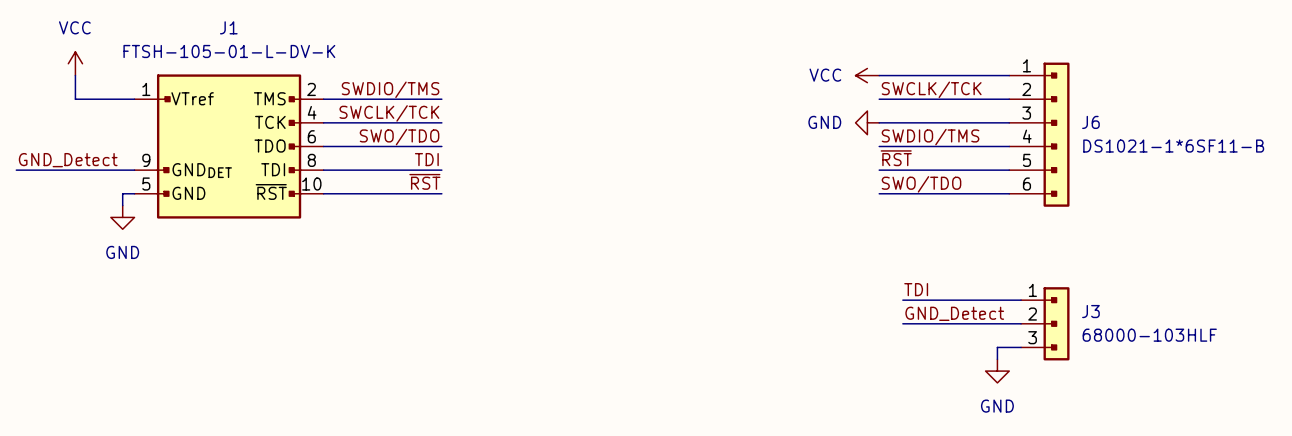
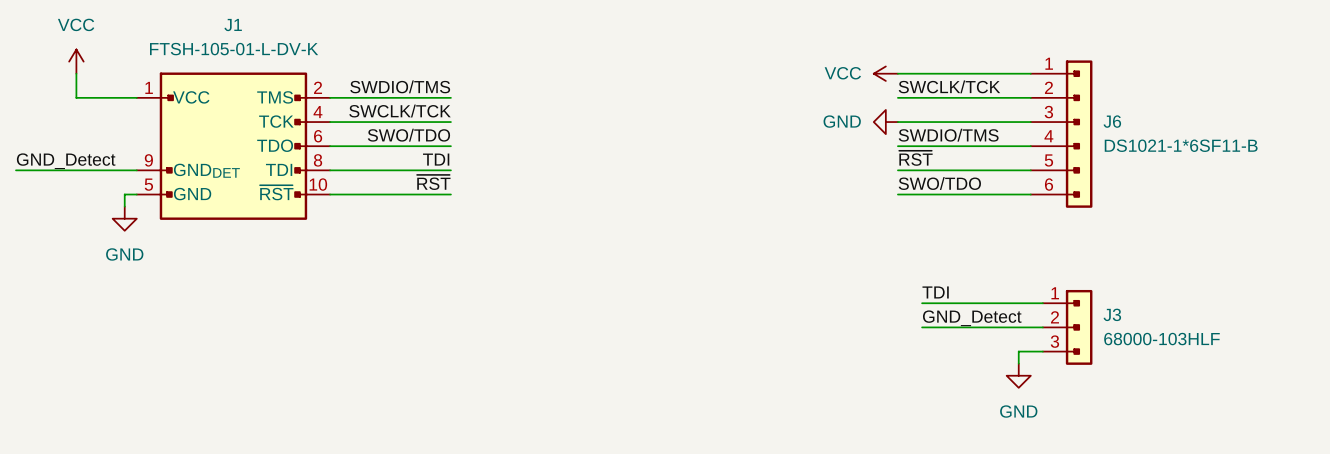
J1 pin name: VTref (192, 98) -> VCC (191, 97)

